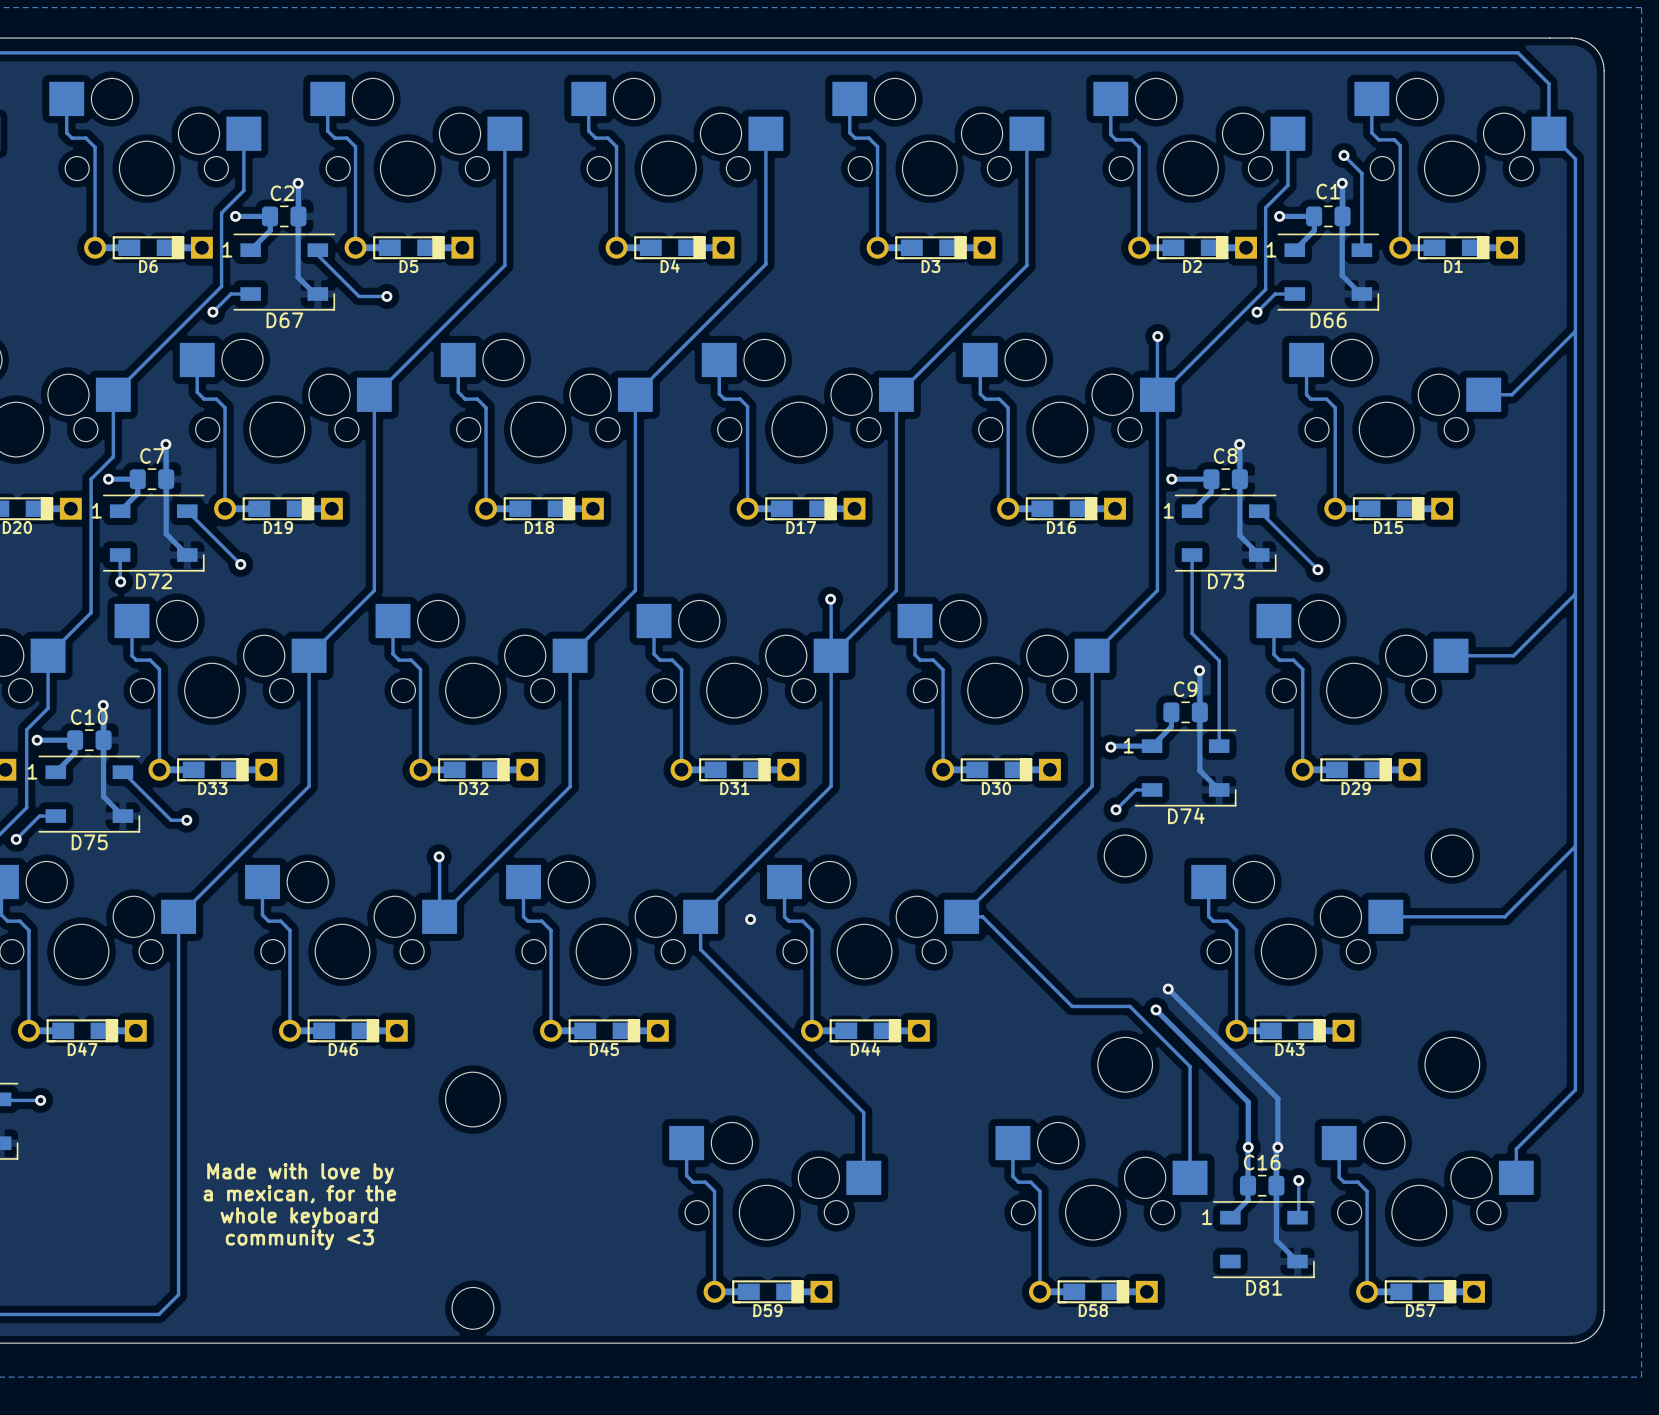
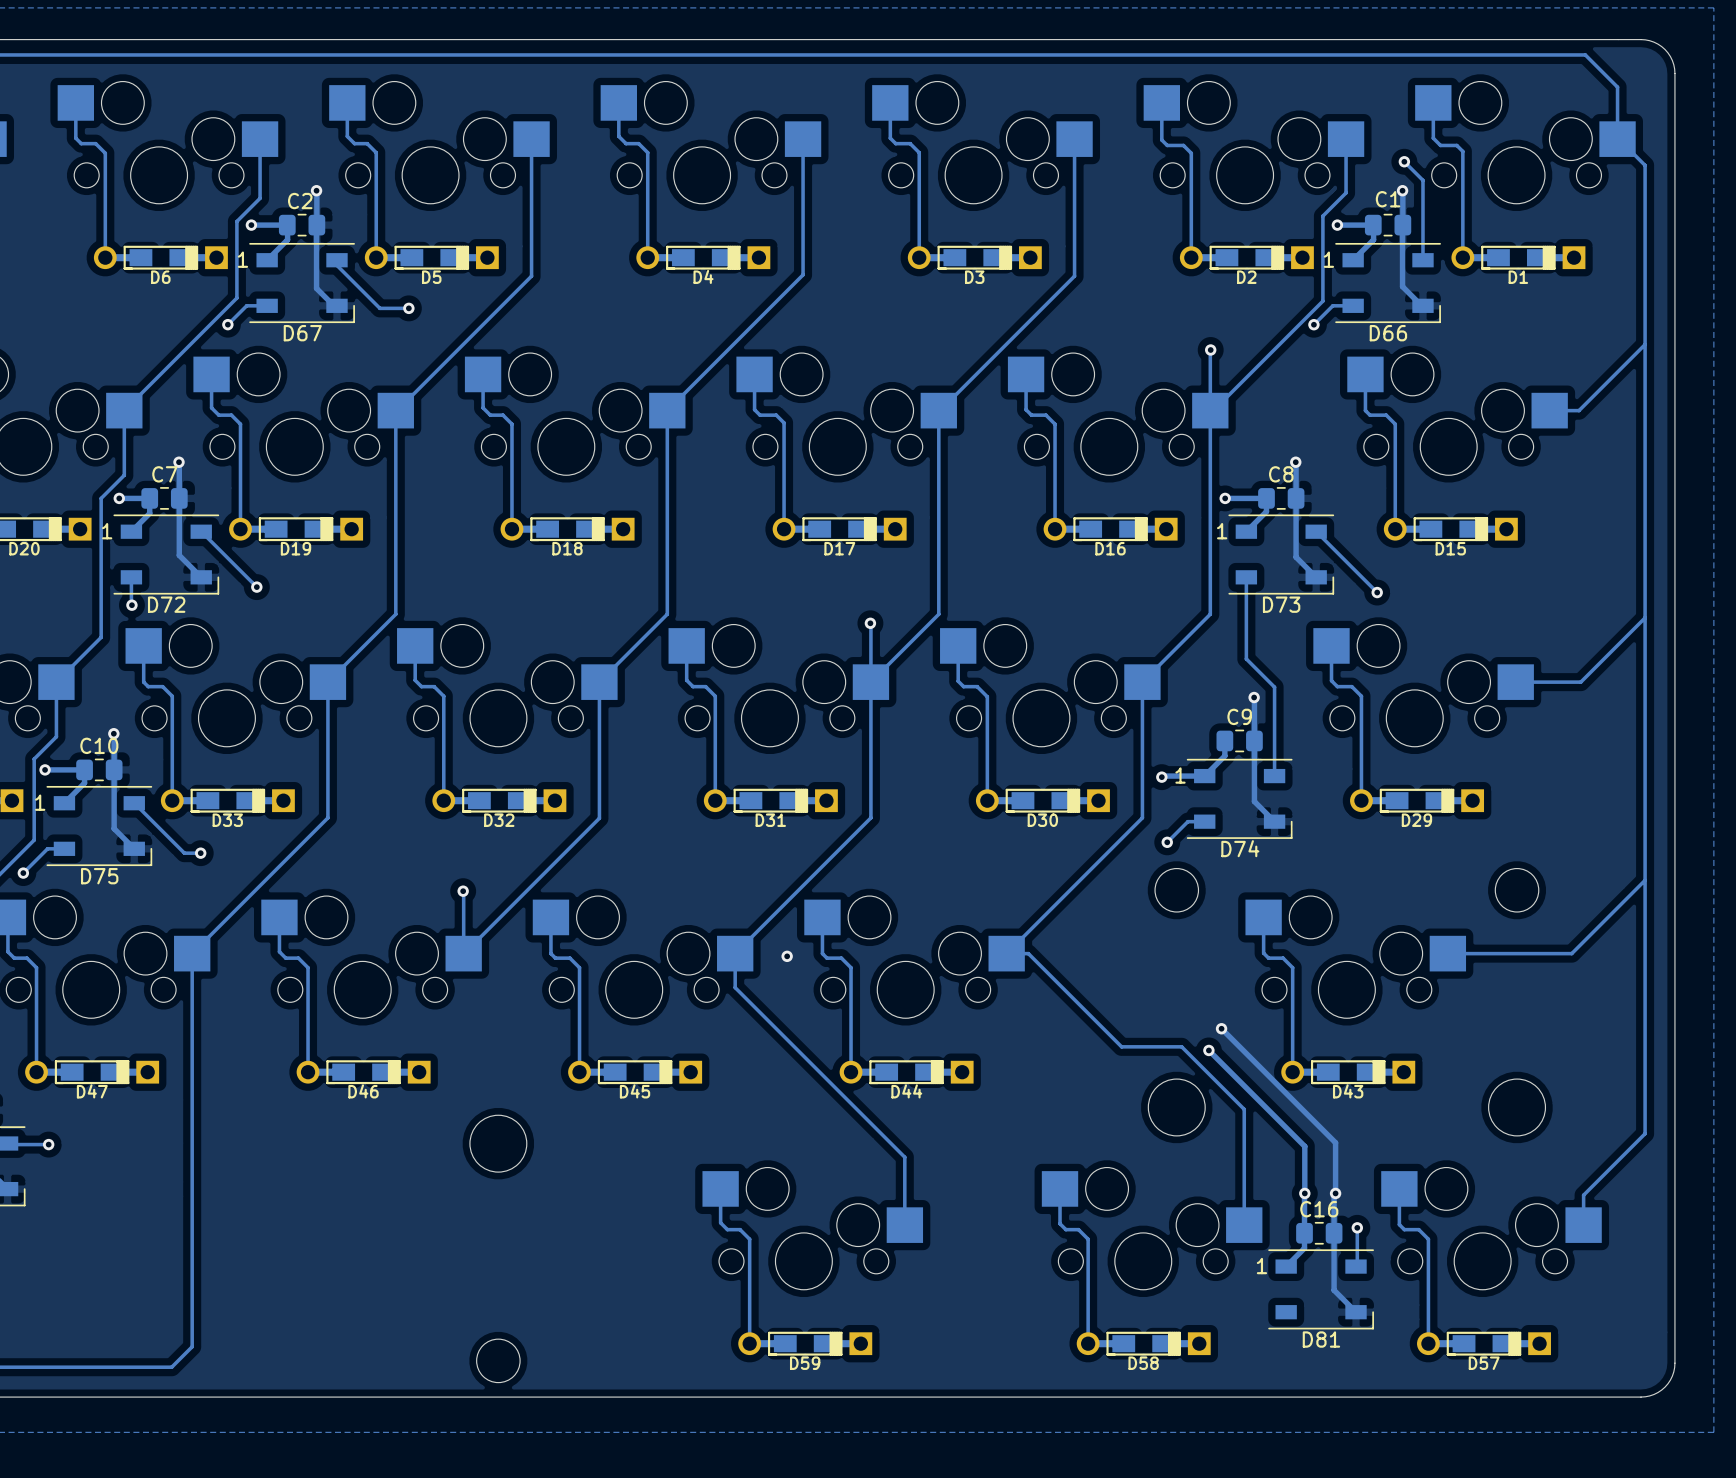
text: Made with love by (300, 1173) -> none
text: a mexican, for the (299, 1194) -> none
text: whole keyboard (299, 1217) -> none
text: community <3 (299, 1239) -> none

